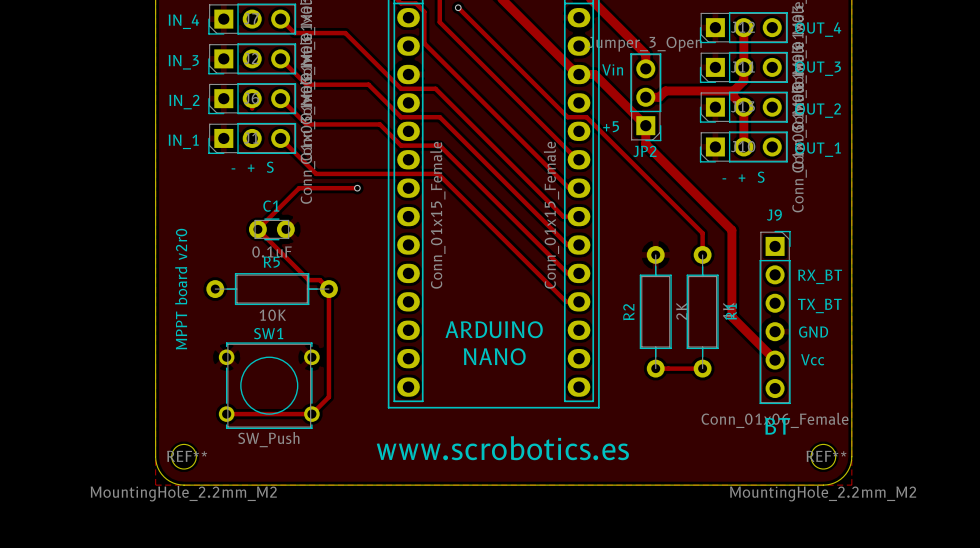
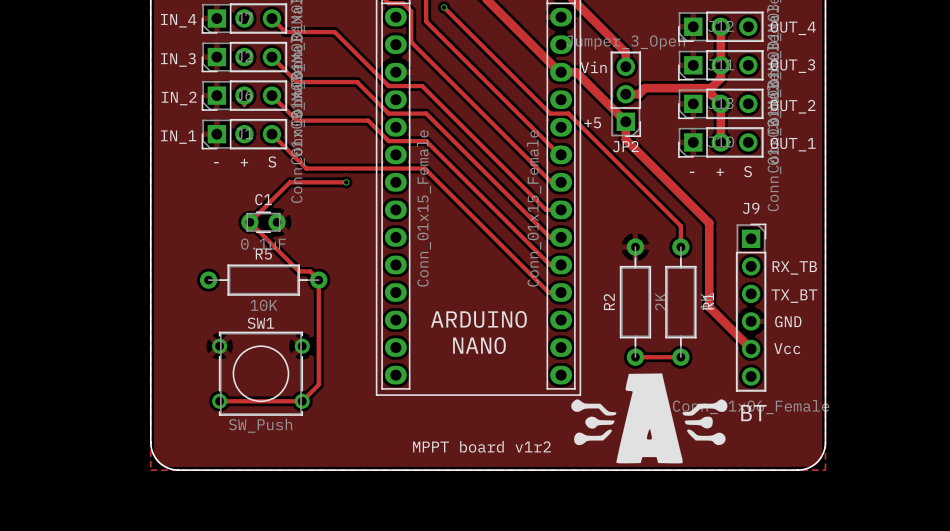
text: RX_BT (820, 276) -> RX_TB (794, 267)
text: MPPT board v2r0 (181, 289) -> none
drawing: none -> [571, 373, 728, 464]
text: www.scrobotics.es (502, 448) -> none
REF**: MountingHole_2.2mm_M2 (184, 456) -> none
REF**: MountingHole_2.2mm_M2 (823, 456) -> none
text: none -> MPPT board v1r2 (481, 446)

